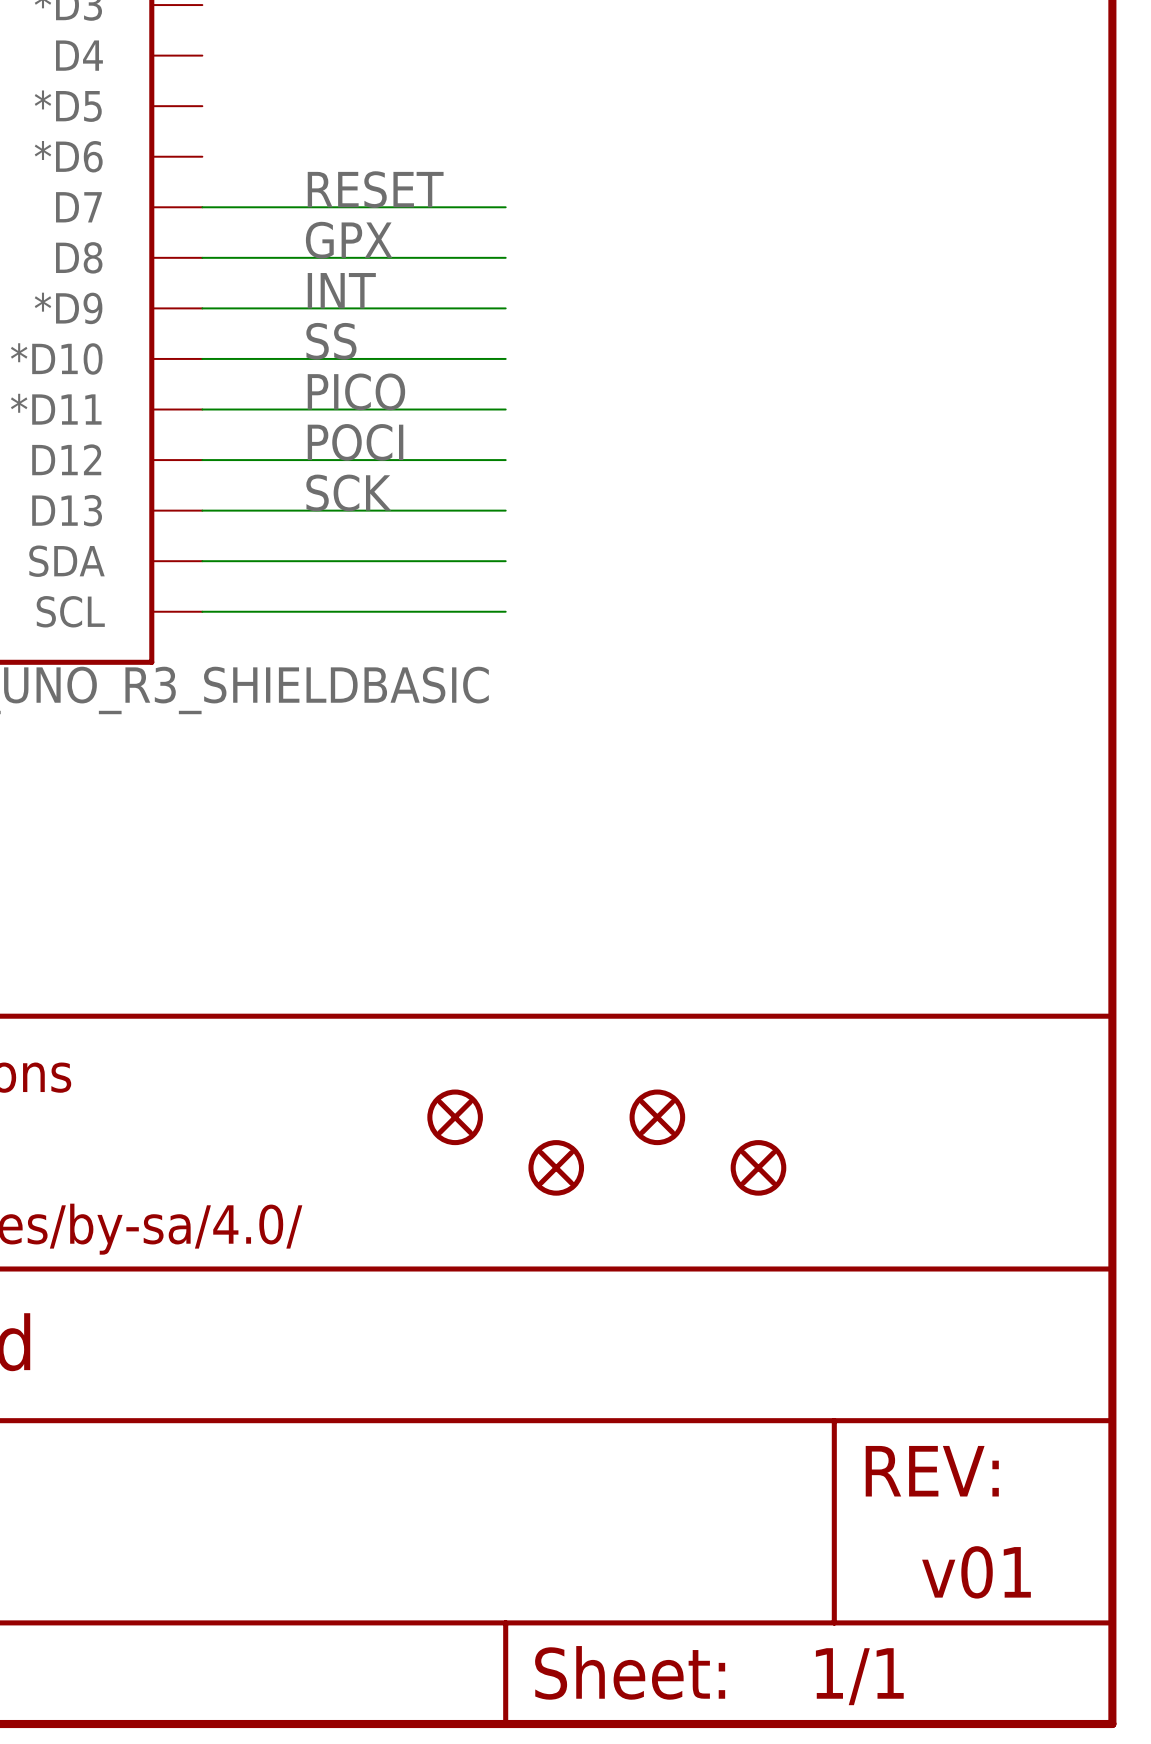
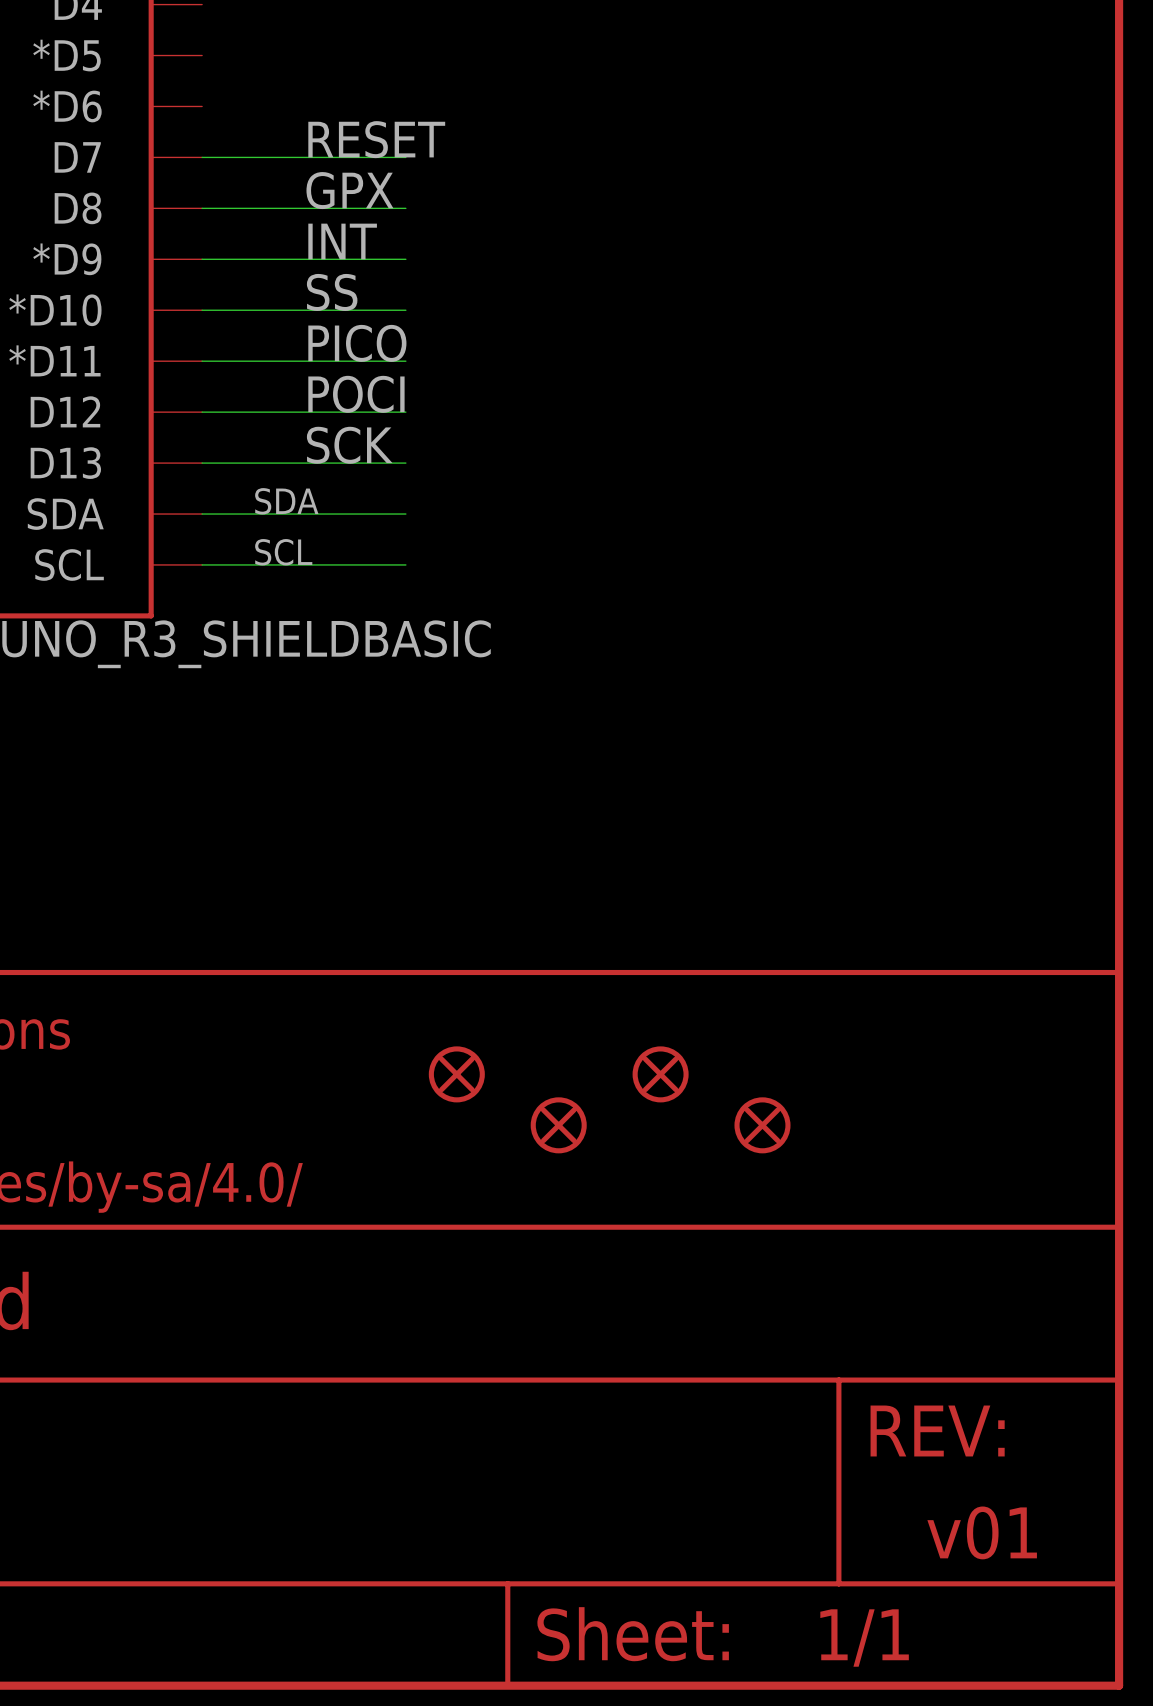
wire: (404, 207) (505, 207) -> none
wire: (404, 257) (505, 257) -> none
wire: (404, 308) (505, 308) -> none
wire: (404, 358) (505, 358) -> none
wire: (404, 409) (505, 409) -> none
wire: (404, 460) (505, 460) -> none
wire: (404, 510) (505, 510) -> none
label: none -> SDA (286, 501)
wire: (404, 561) (505, 561) -> none
label: none -> SCL (283, 552)
wire: (404, 611) (505, 611) -> none

